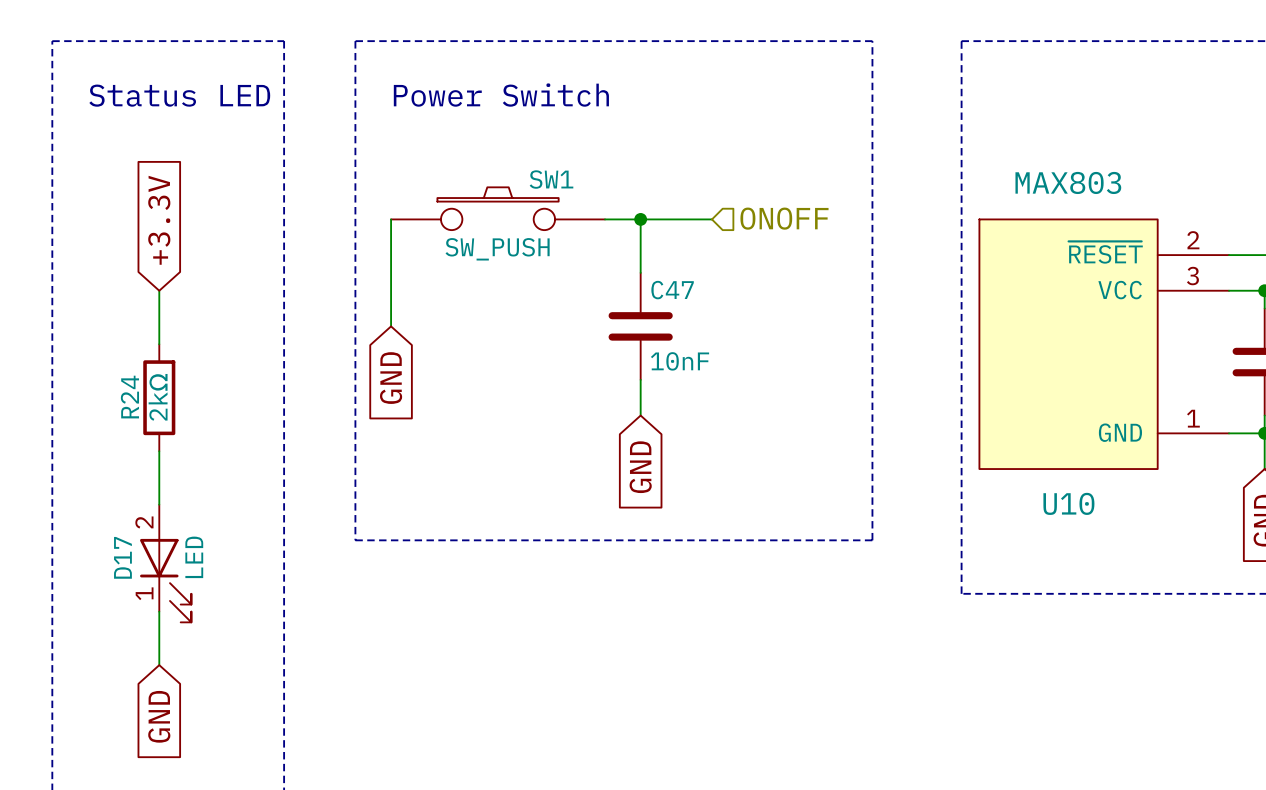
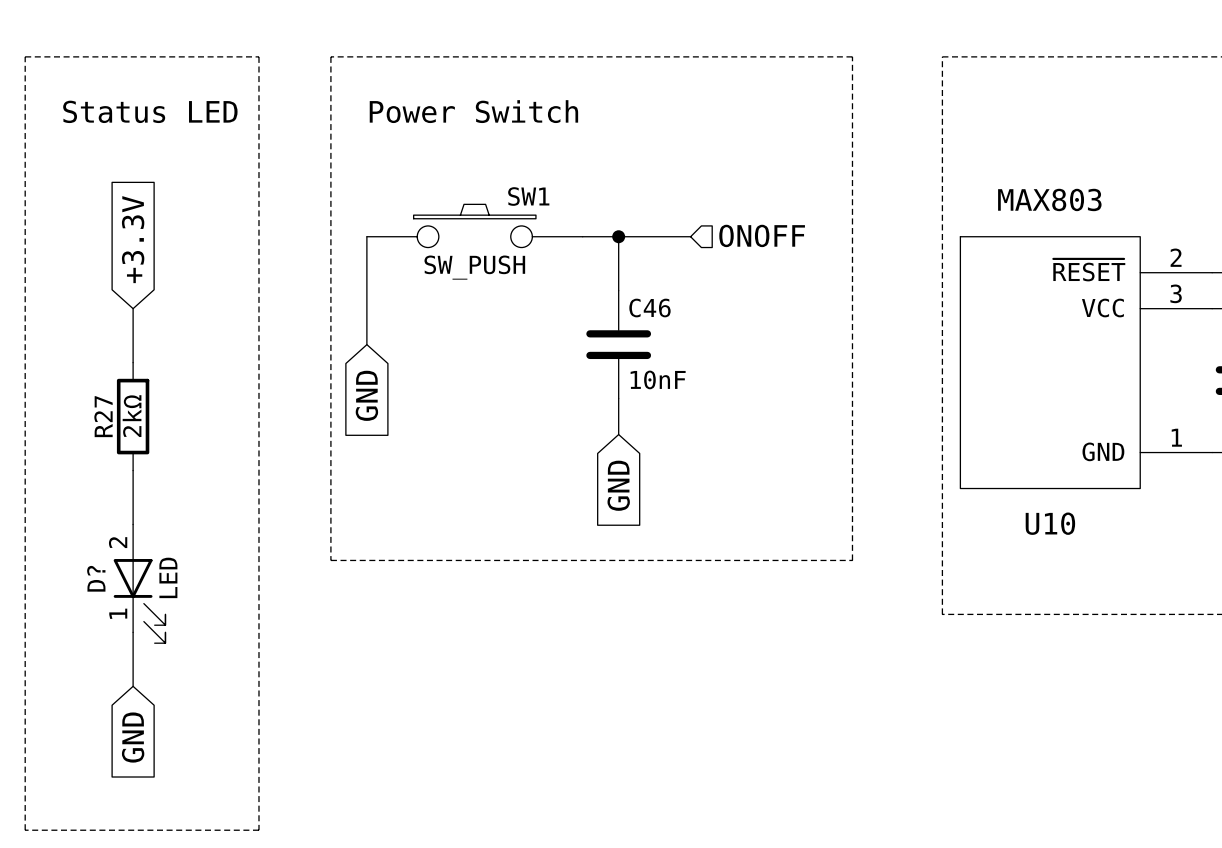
C47 name: C47 (672, 290) -> C46 (649, 308)
R24 name: R24 (129, 397) -> R27 (103, 416)
D17 name: D17 (122, 557) -> D? (96, 578)

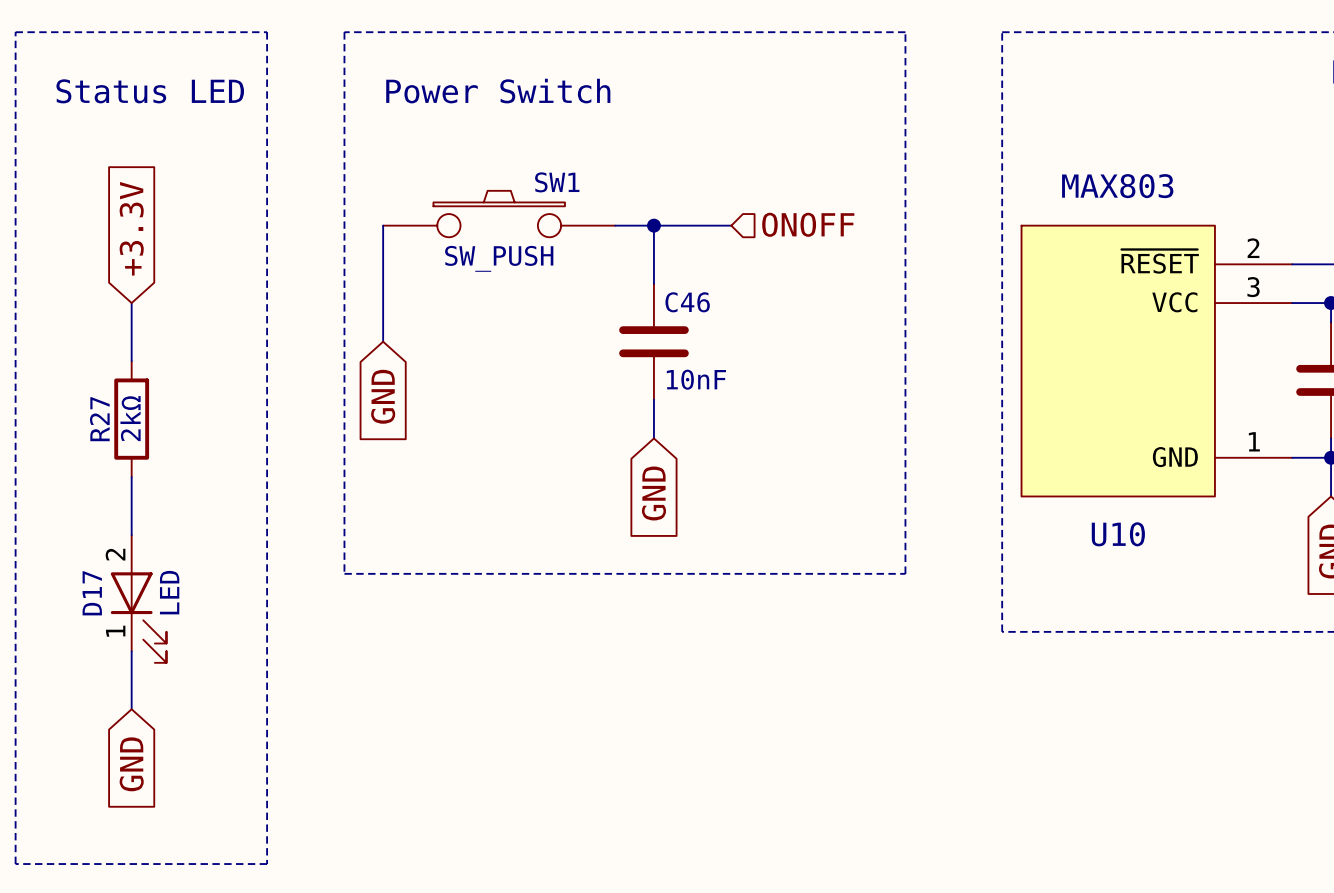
D? name: D? (96, 578) -> D17 (92, 593)

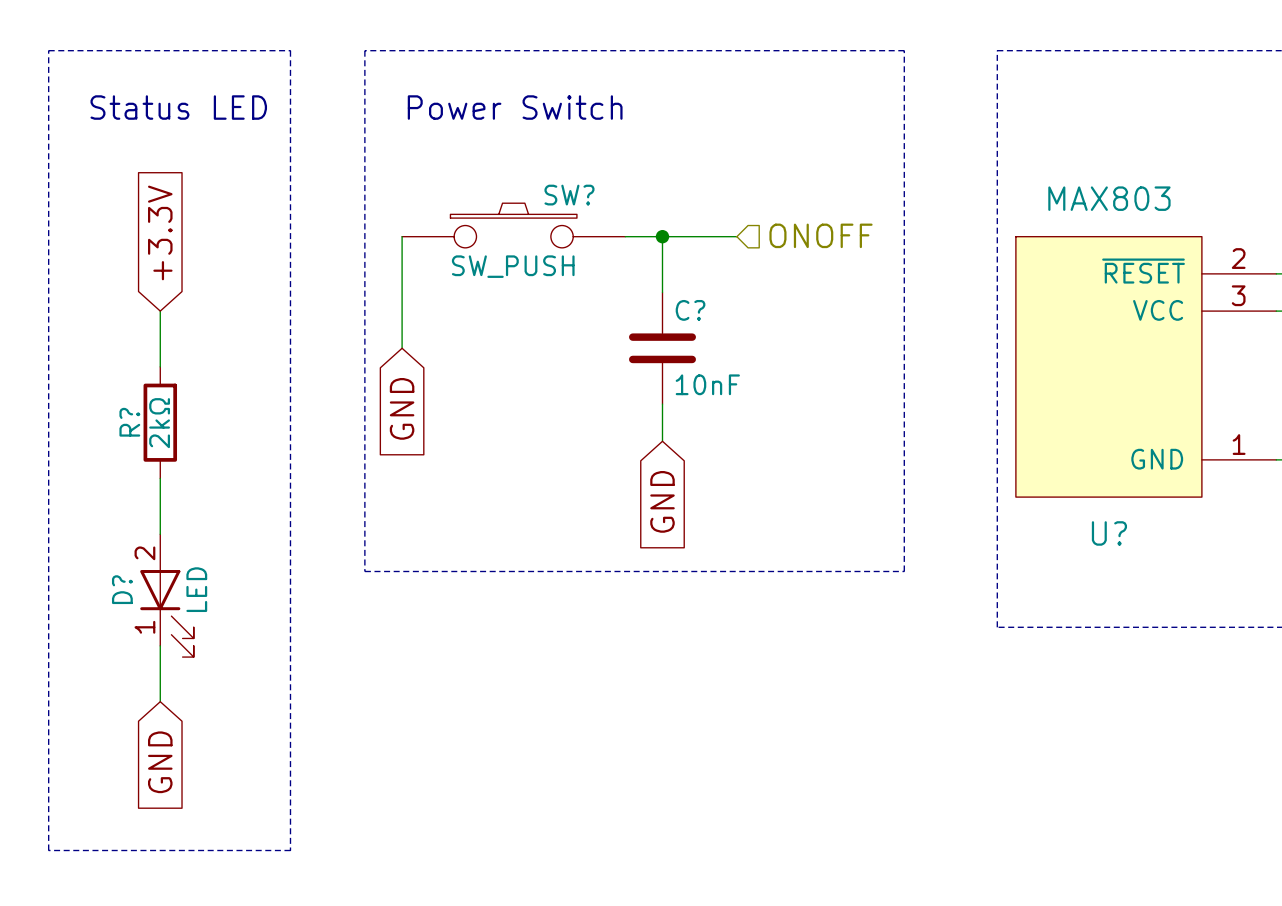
SW1 name: SW1 (557, 182) -> SW? (569, 195)
C46 name: C46 (687, 302) -> C? (690, 310)
R27 name: R27 (99, 419) -> R? (129, 422)
U10 name: U10 (1118, 534) -> U? (1109, 533)
D17 name: D17 (92, 593) -> D? (122, 589)

